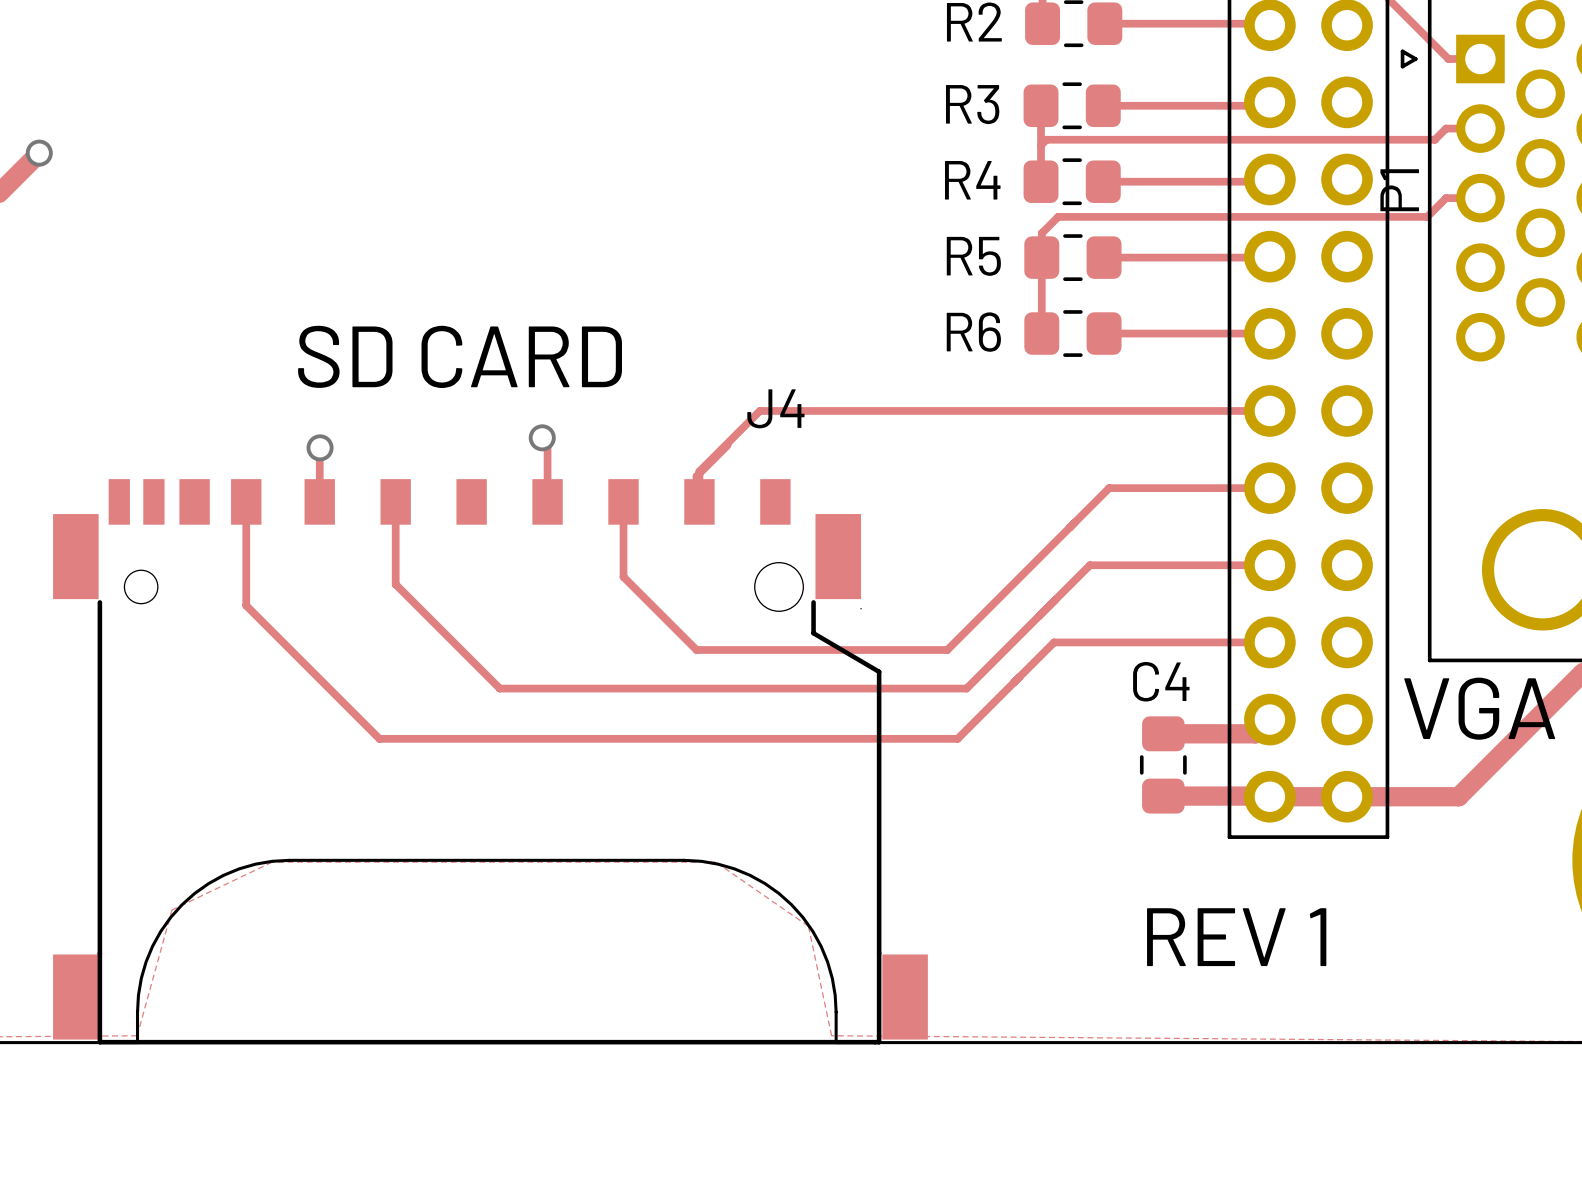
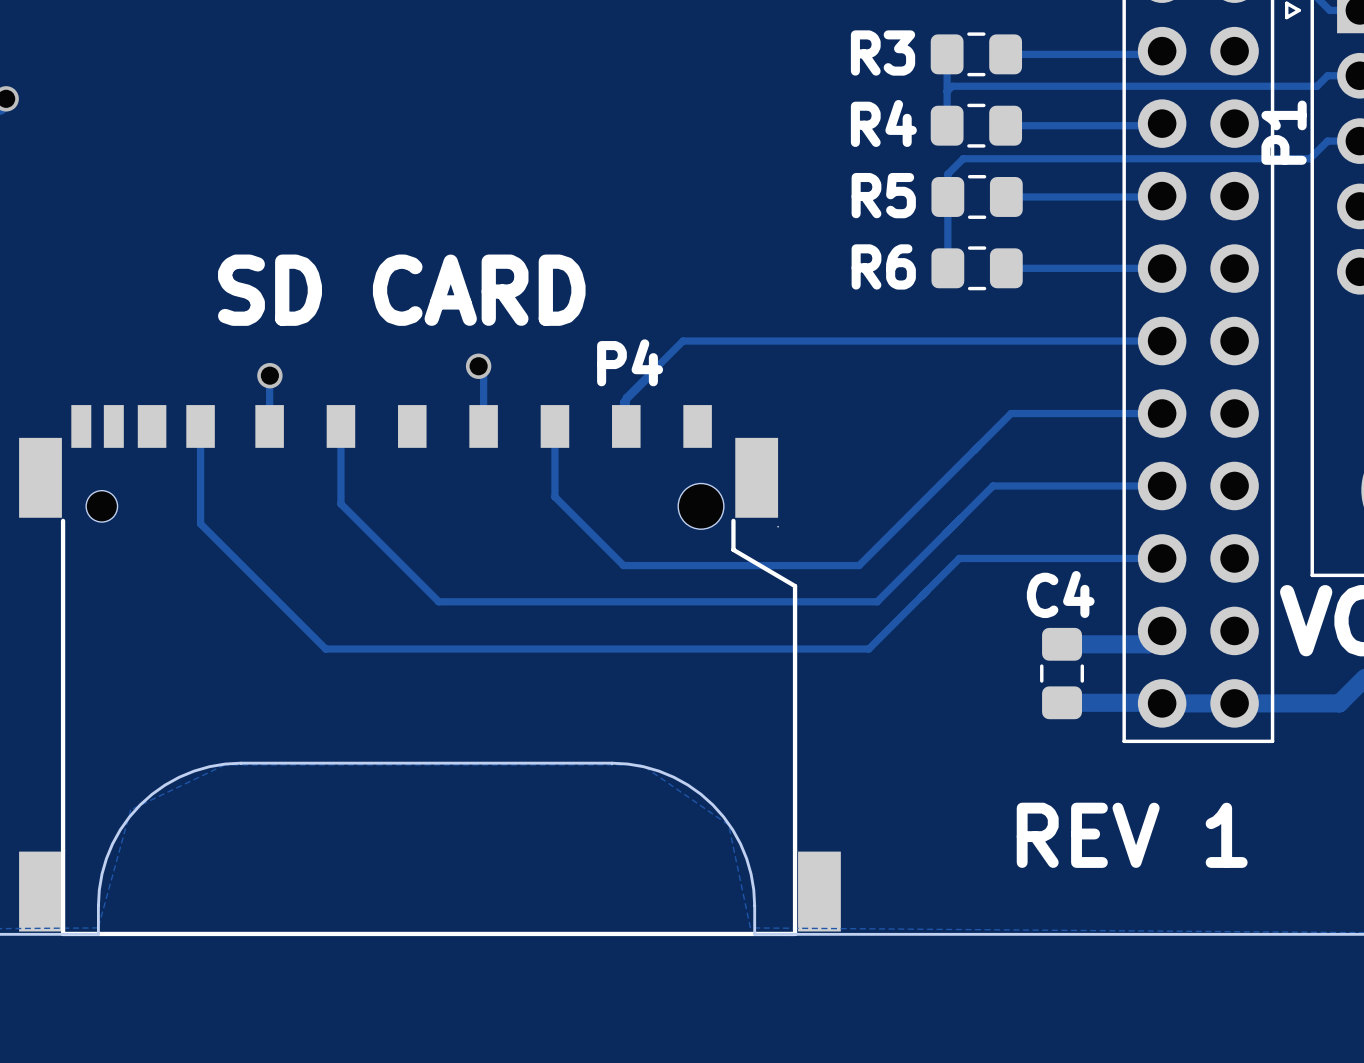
J4 name: J4 (775, 408) -> P4 (630, 362)

